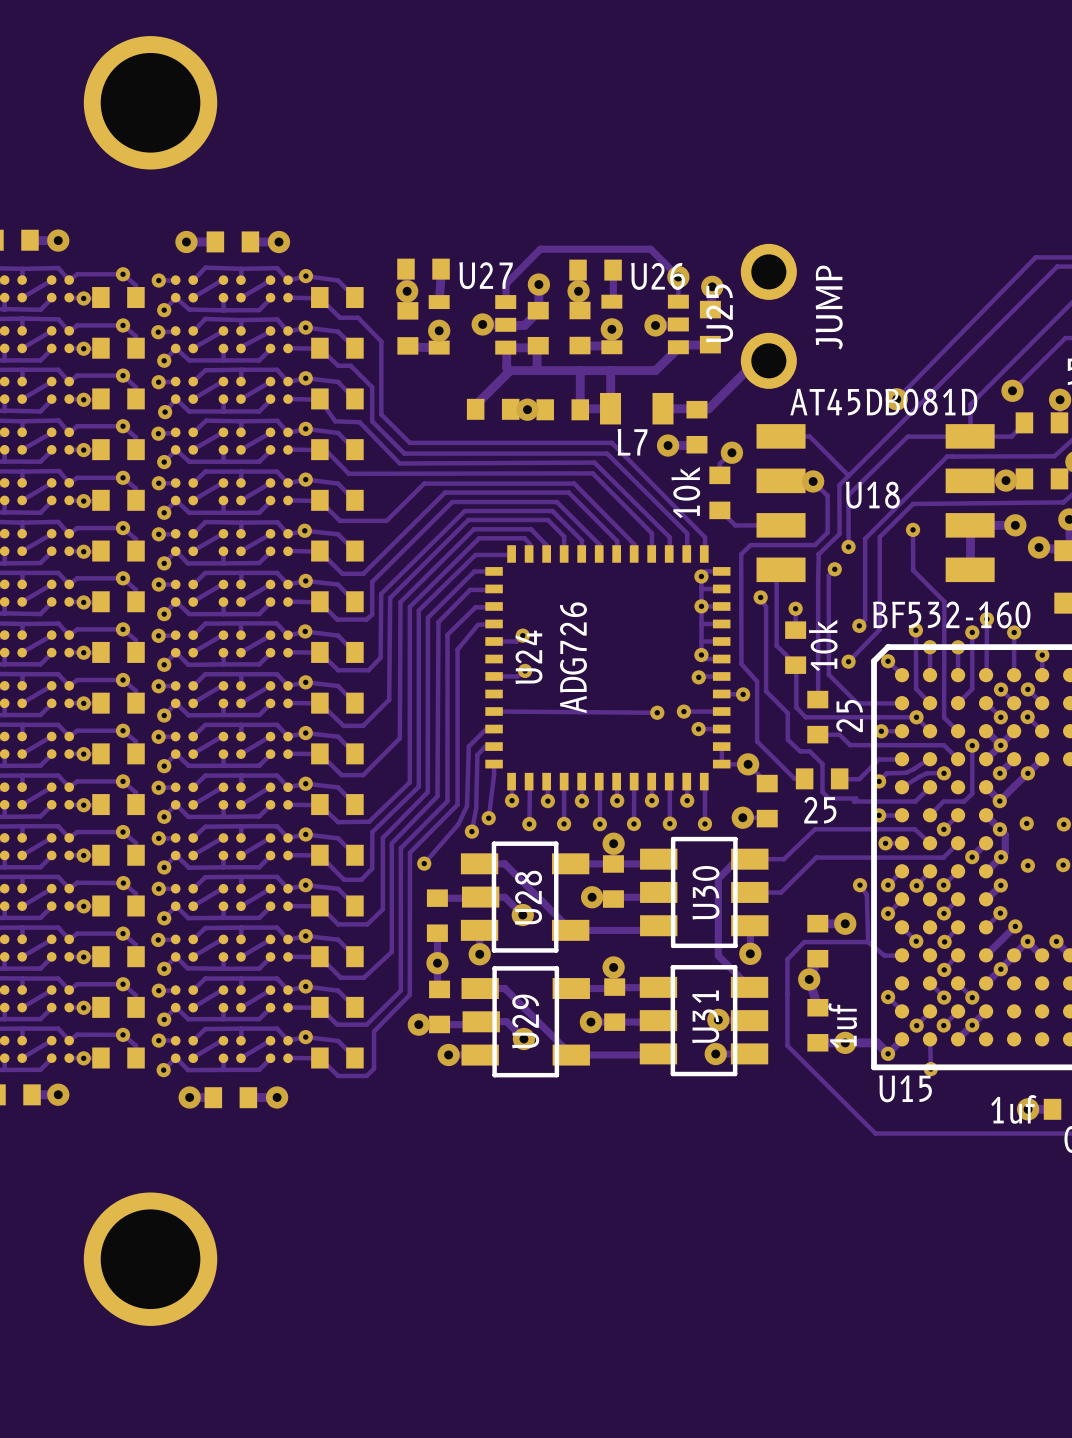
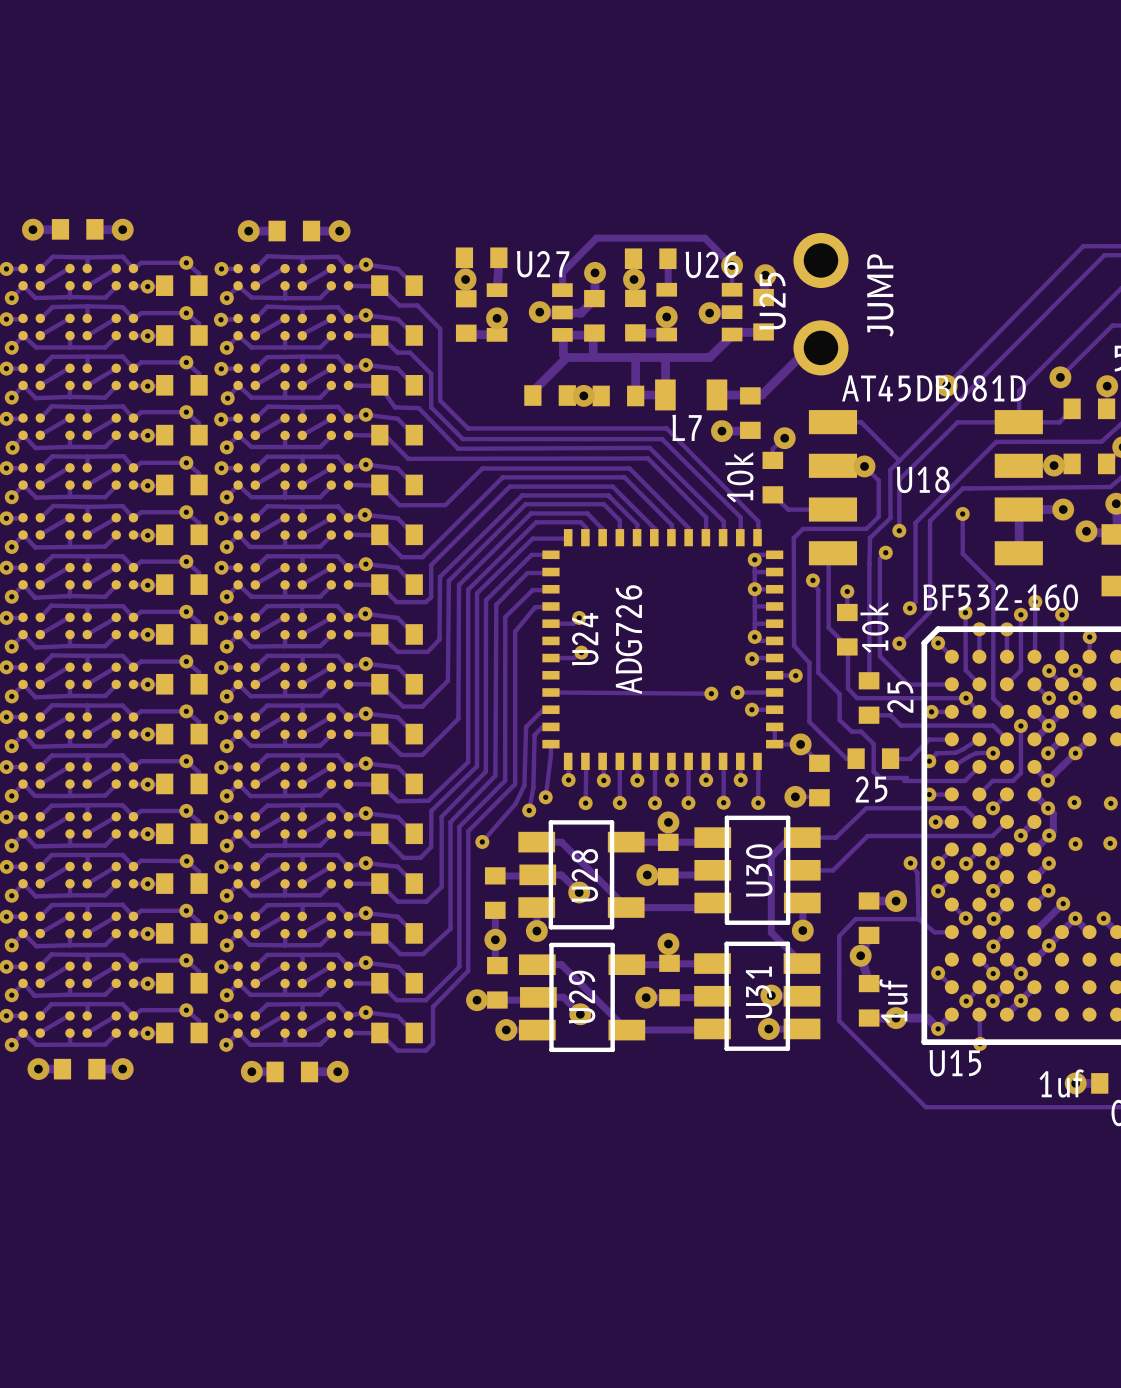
part: (150, 102) -> none
part: (150, 1259) -> none

